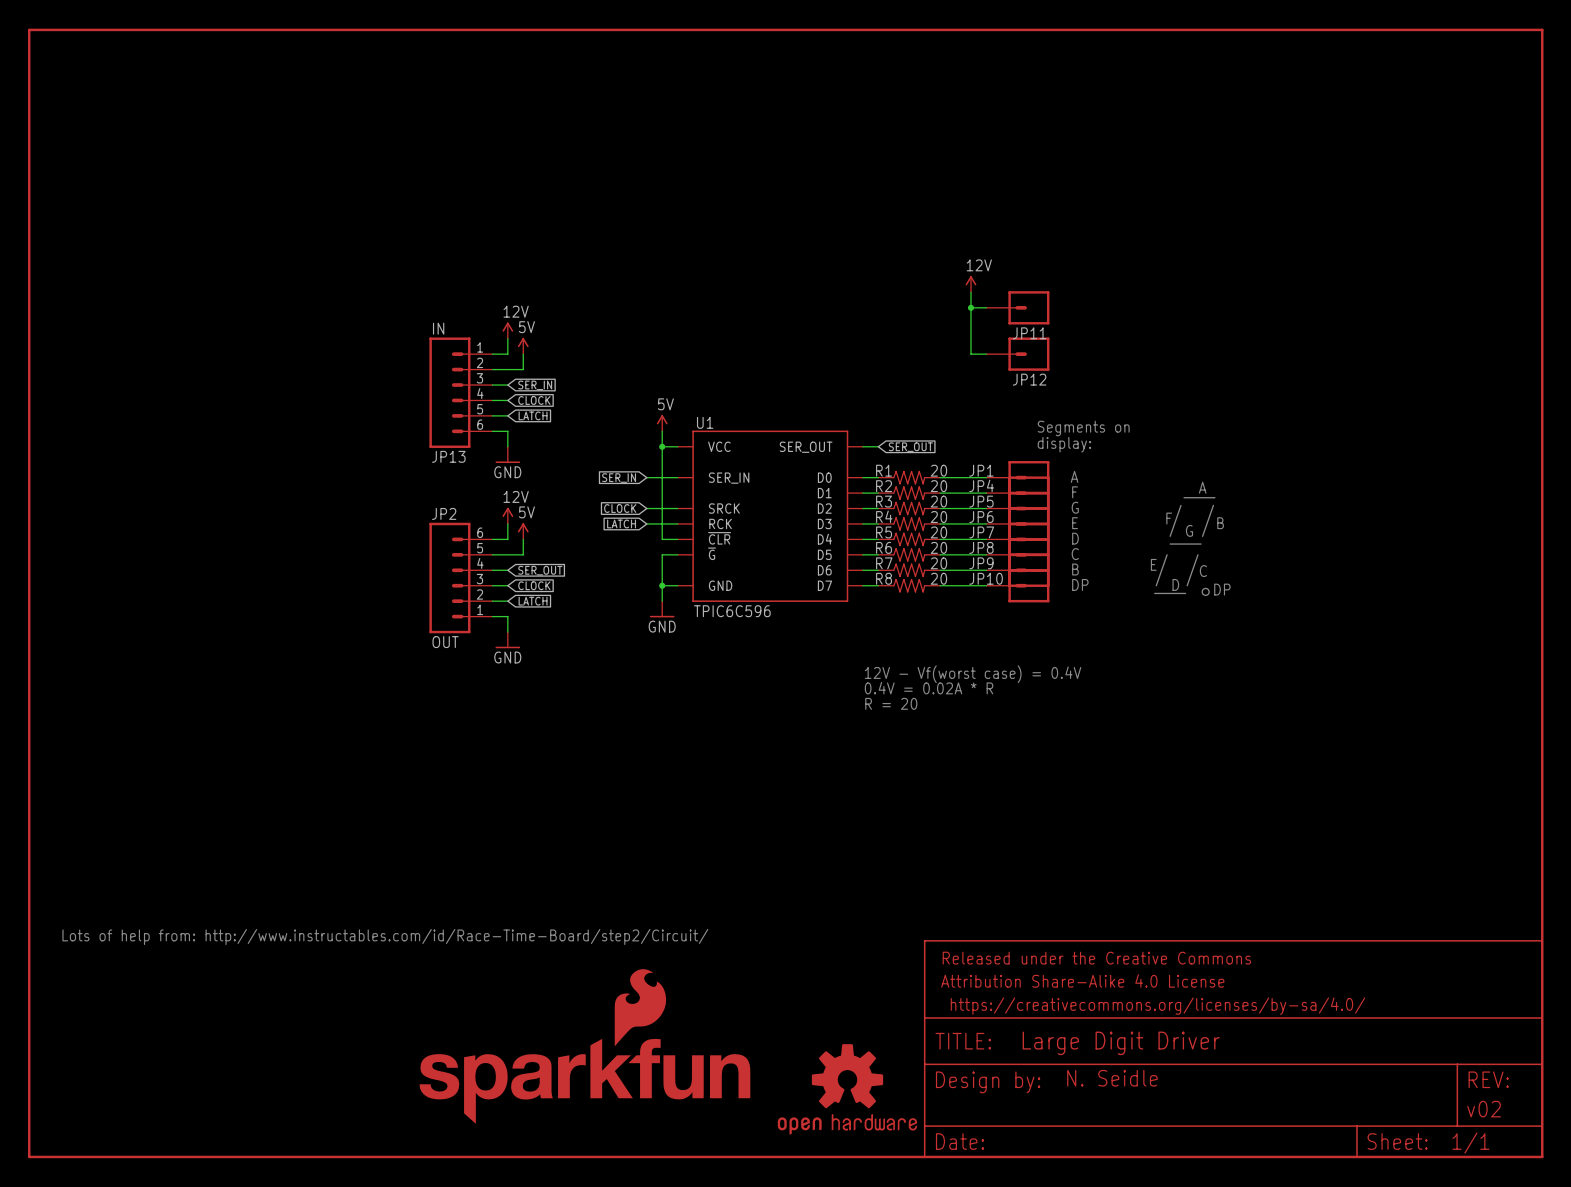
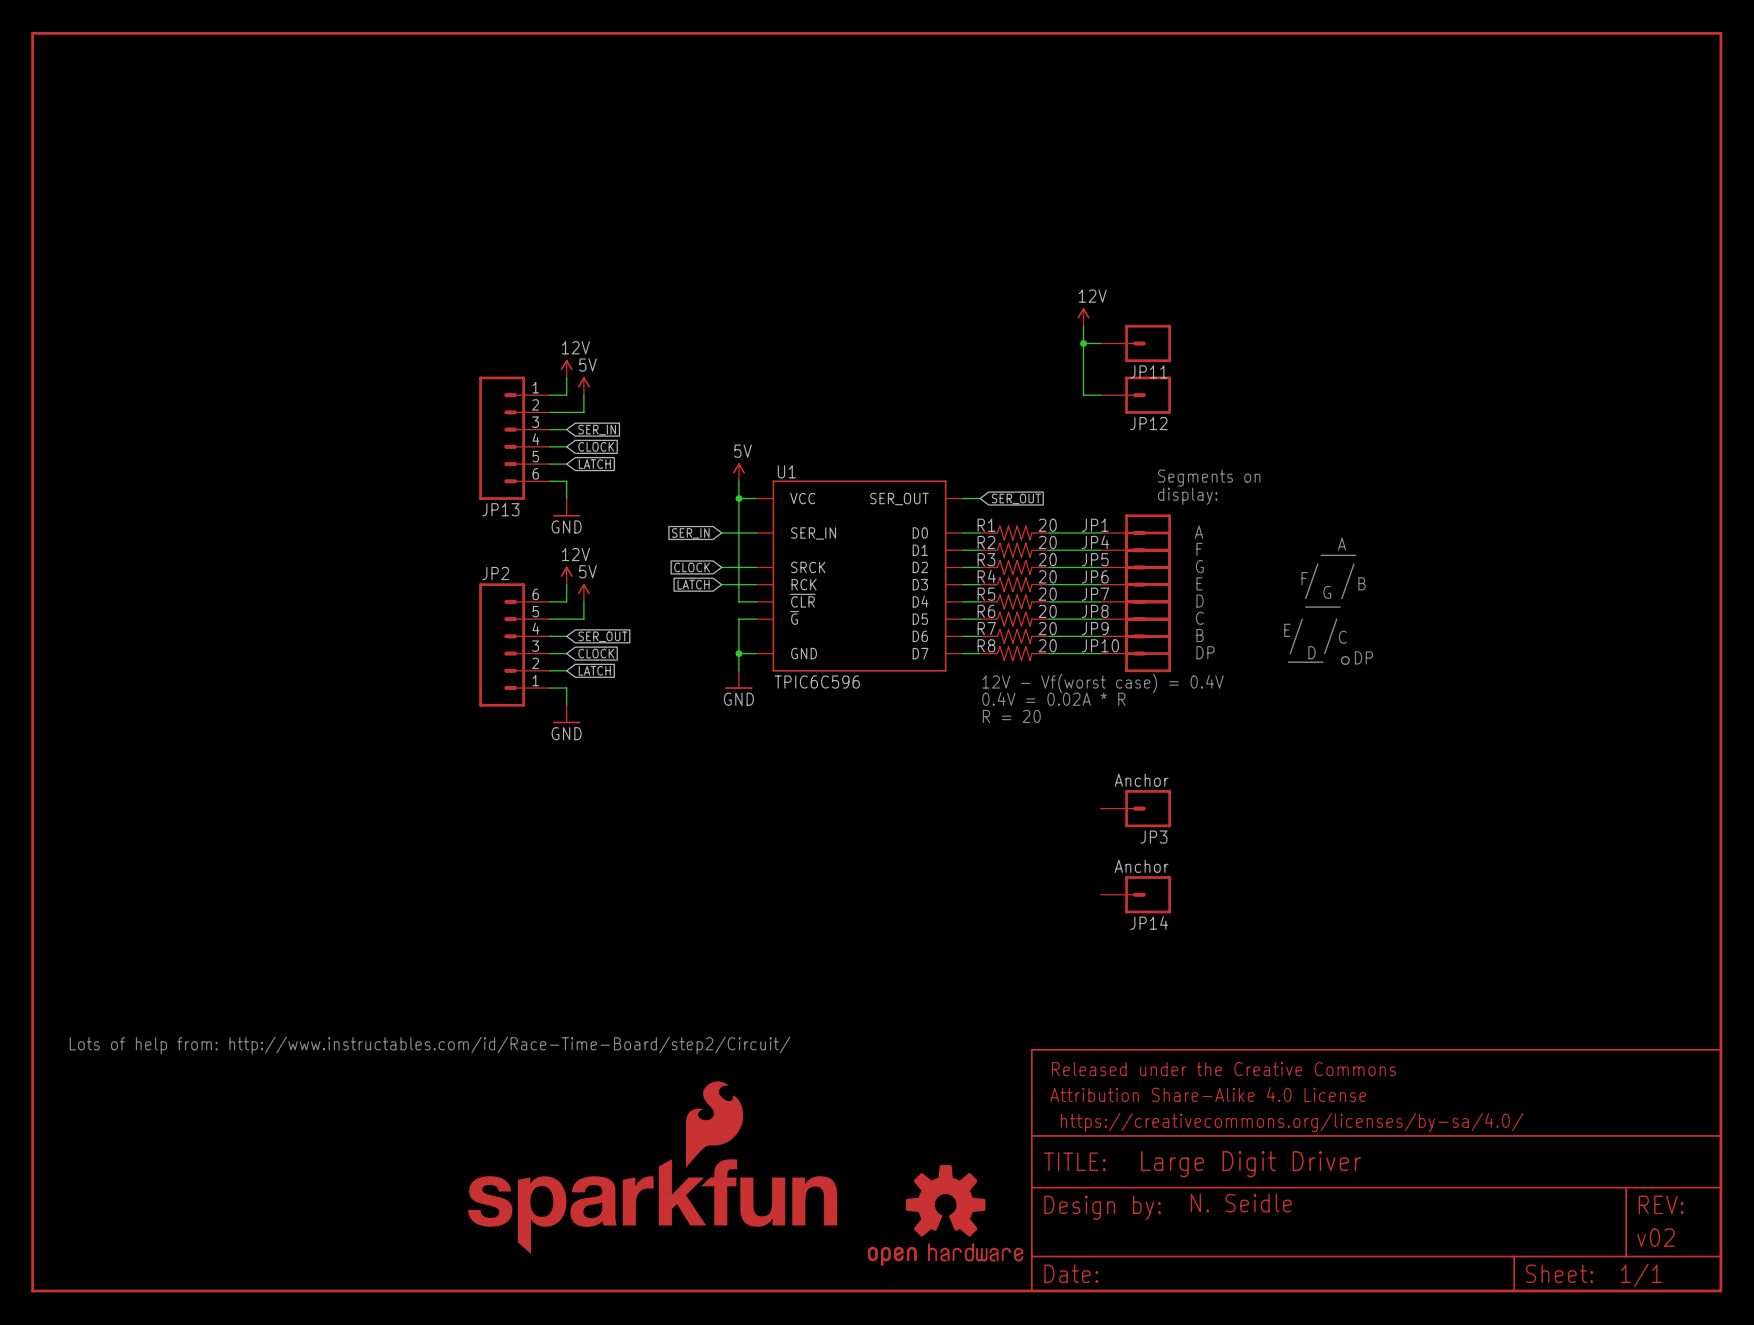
JP13 value: IN (438, 328) -> none
JP2 value: OUT (445, 642) -> none
text position: 12V - Vf(worst case) = 0.4V (973, 674) -> 12V - Vf(worst case) = 0.4V (1102, 683)
text position: 0.4V = 0.02A * R (929, 688) -> 0.4V = 0.02A * R (1053, 698)
text position: R = 20 (891, 703) -> R = 20 (1011, 716)
JP3: none -> Anchor (1135, 808)
JP14: none -> Anchor (1135, 894)

